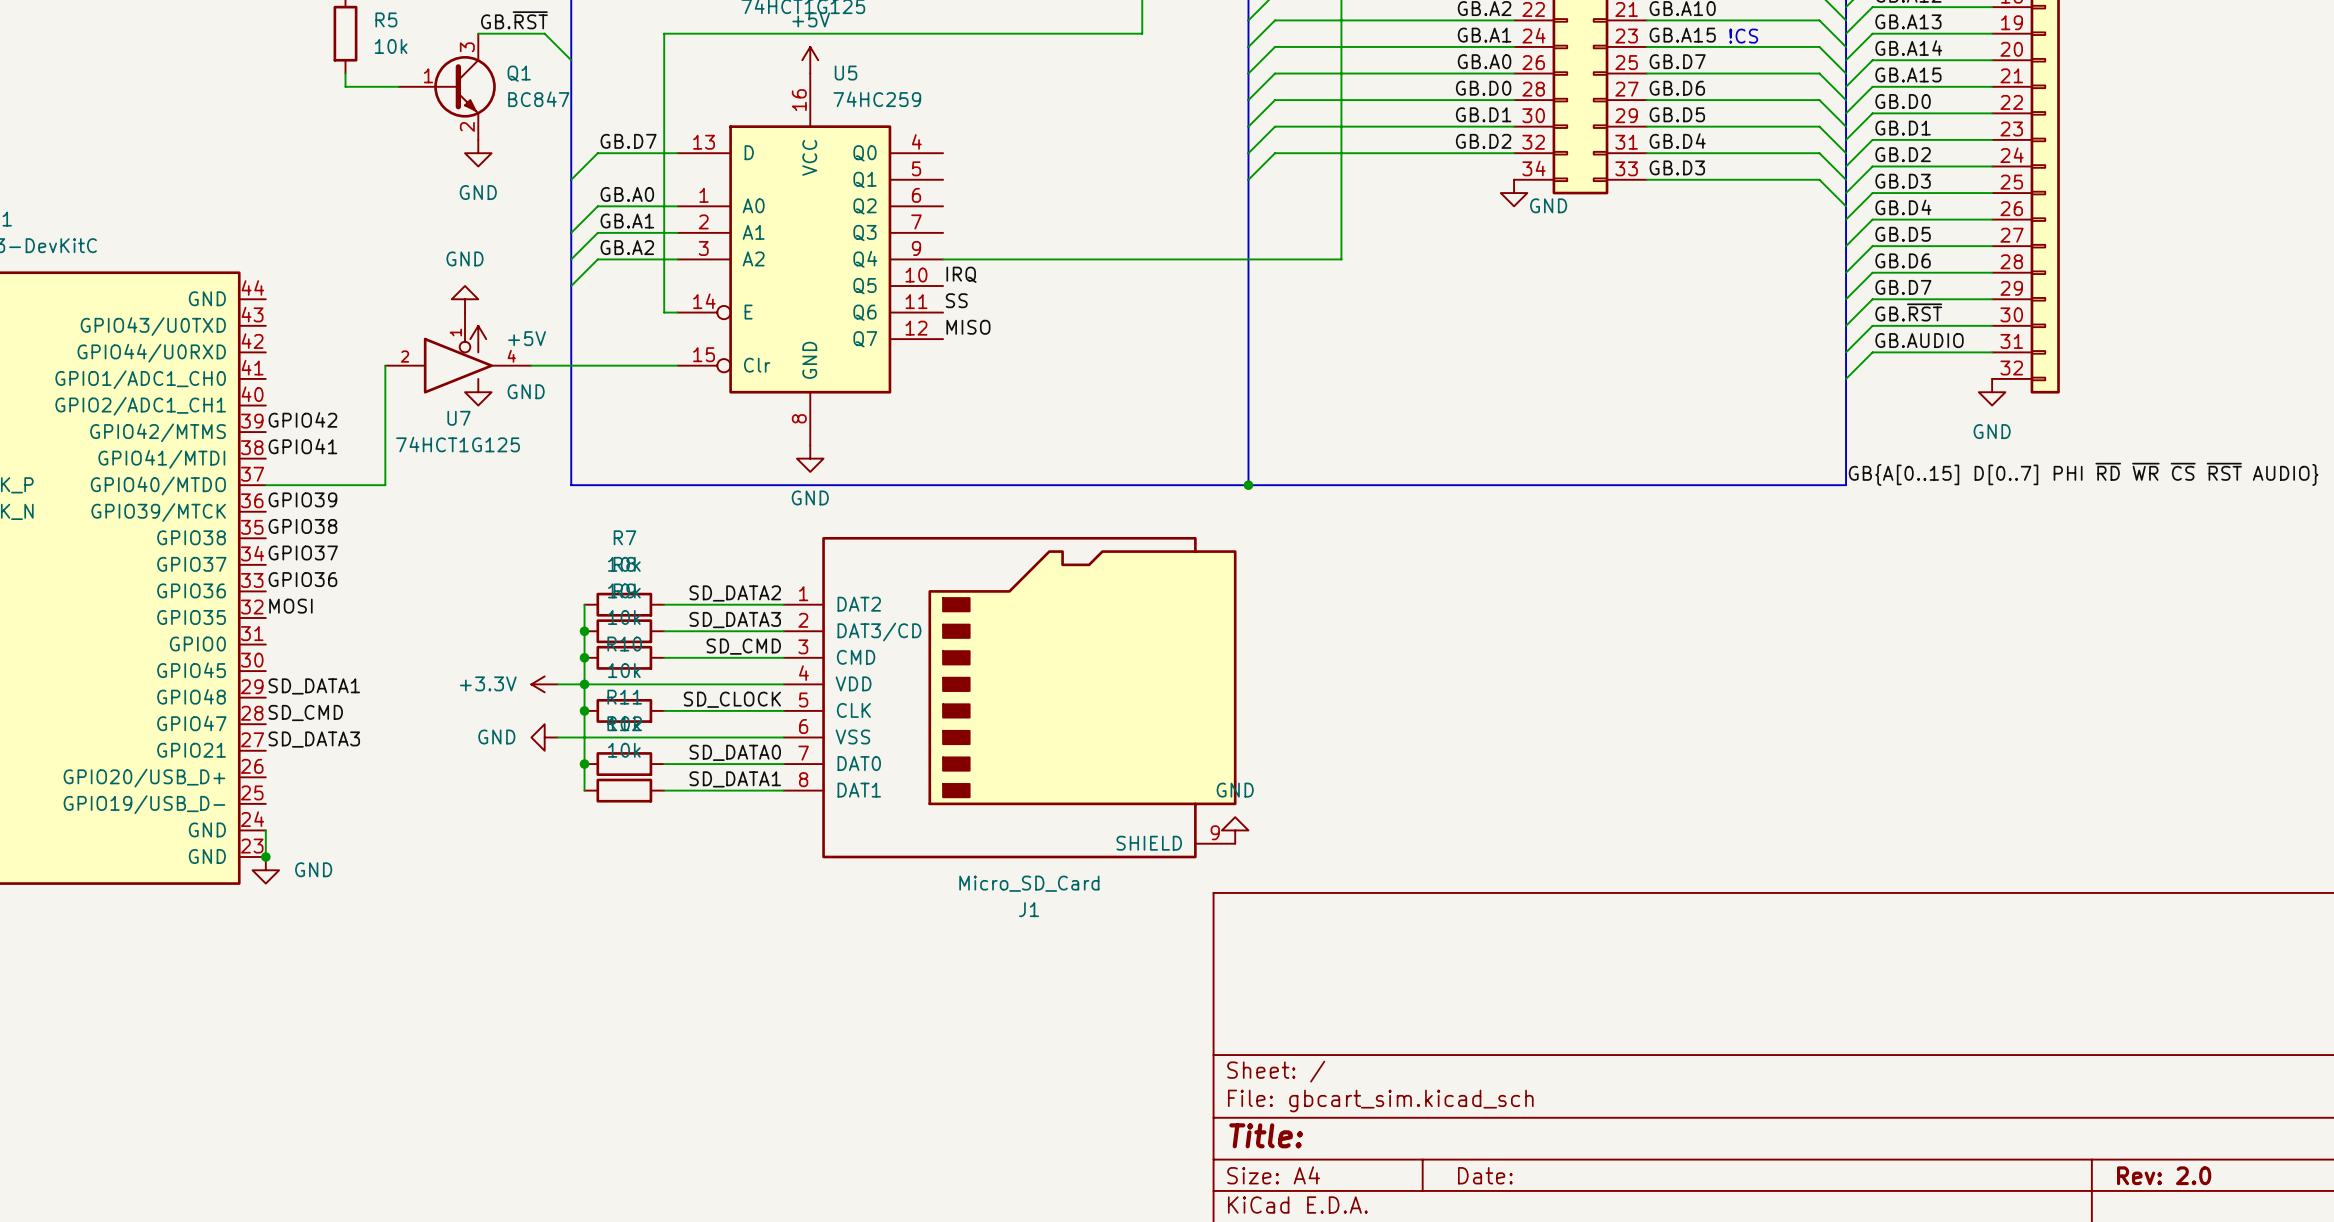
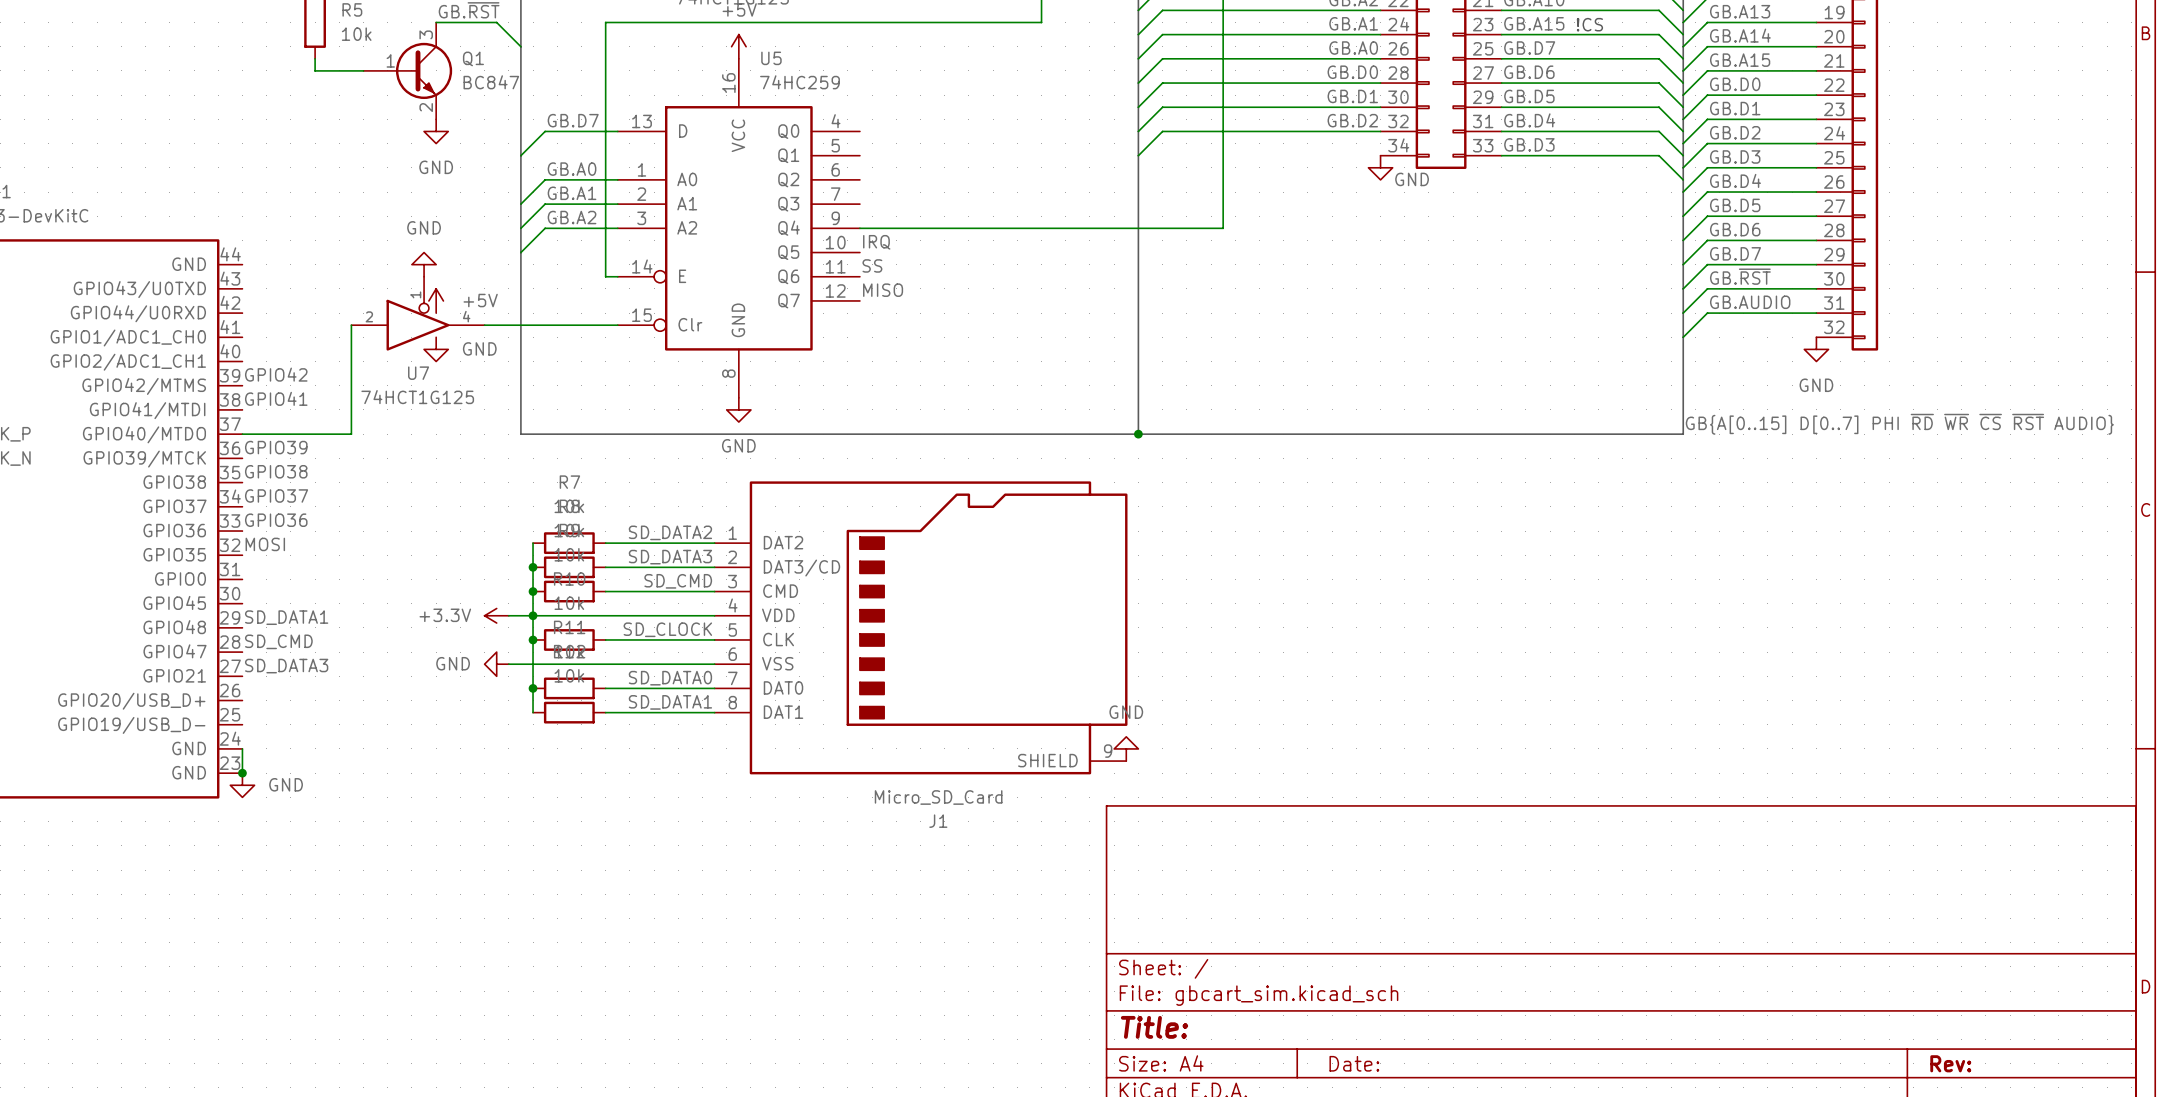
title block: Rev: 2.0 (2164, 1175) -> Rev: (1950, 1063)

